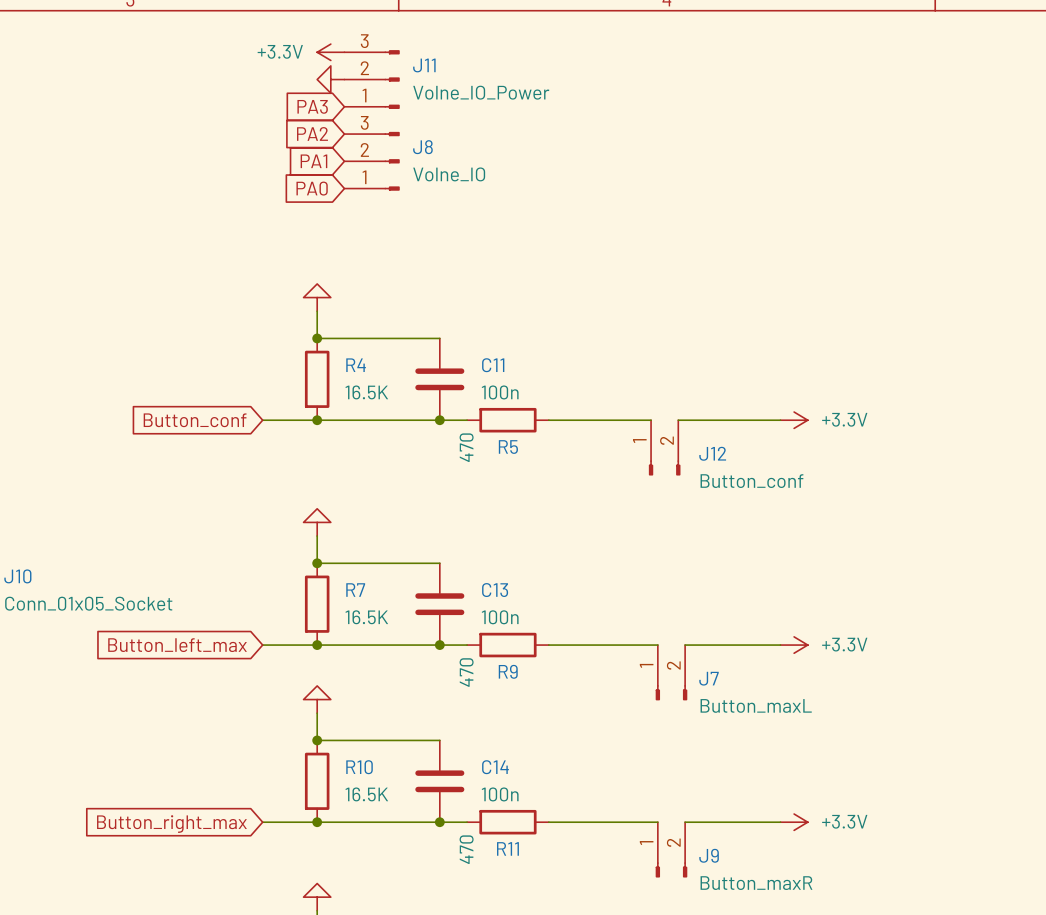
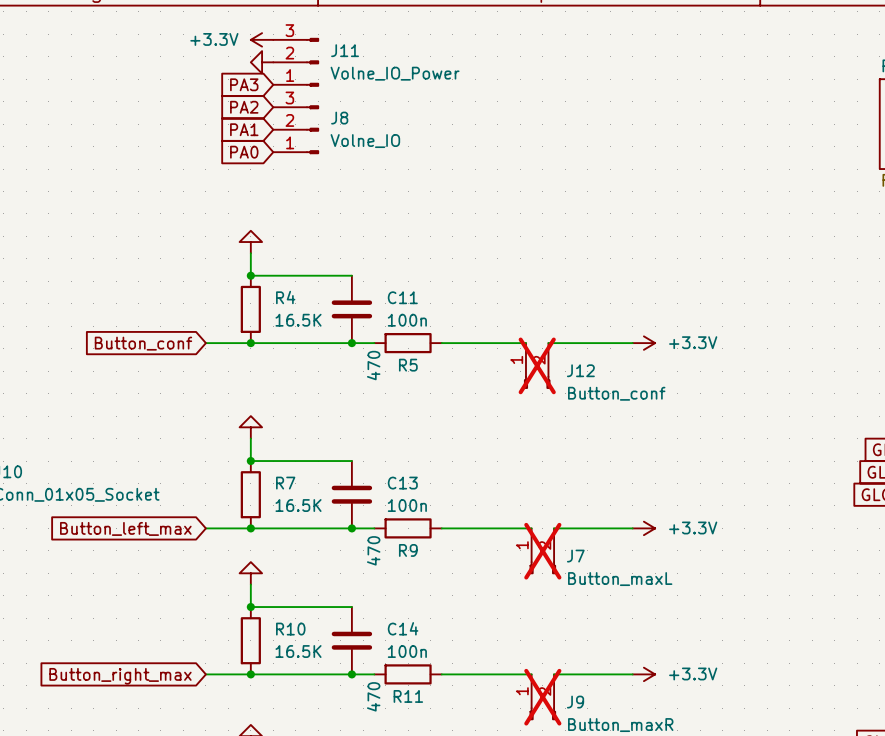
J12 do-not-place cross: none -> (537, 365)
J7 do-not-place cross: none -> (542, 551)
J9 do-not-place cross: none -> (542, 697)

